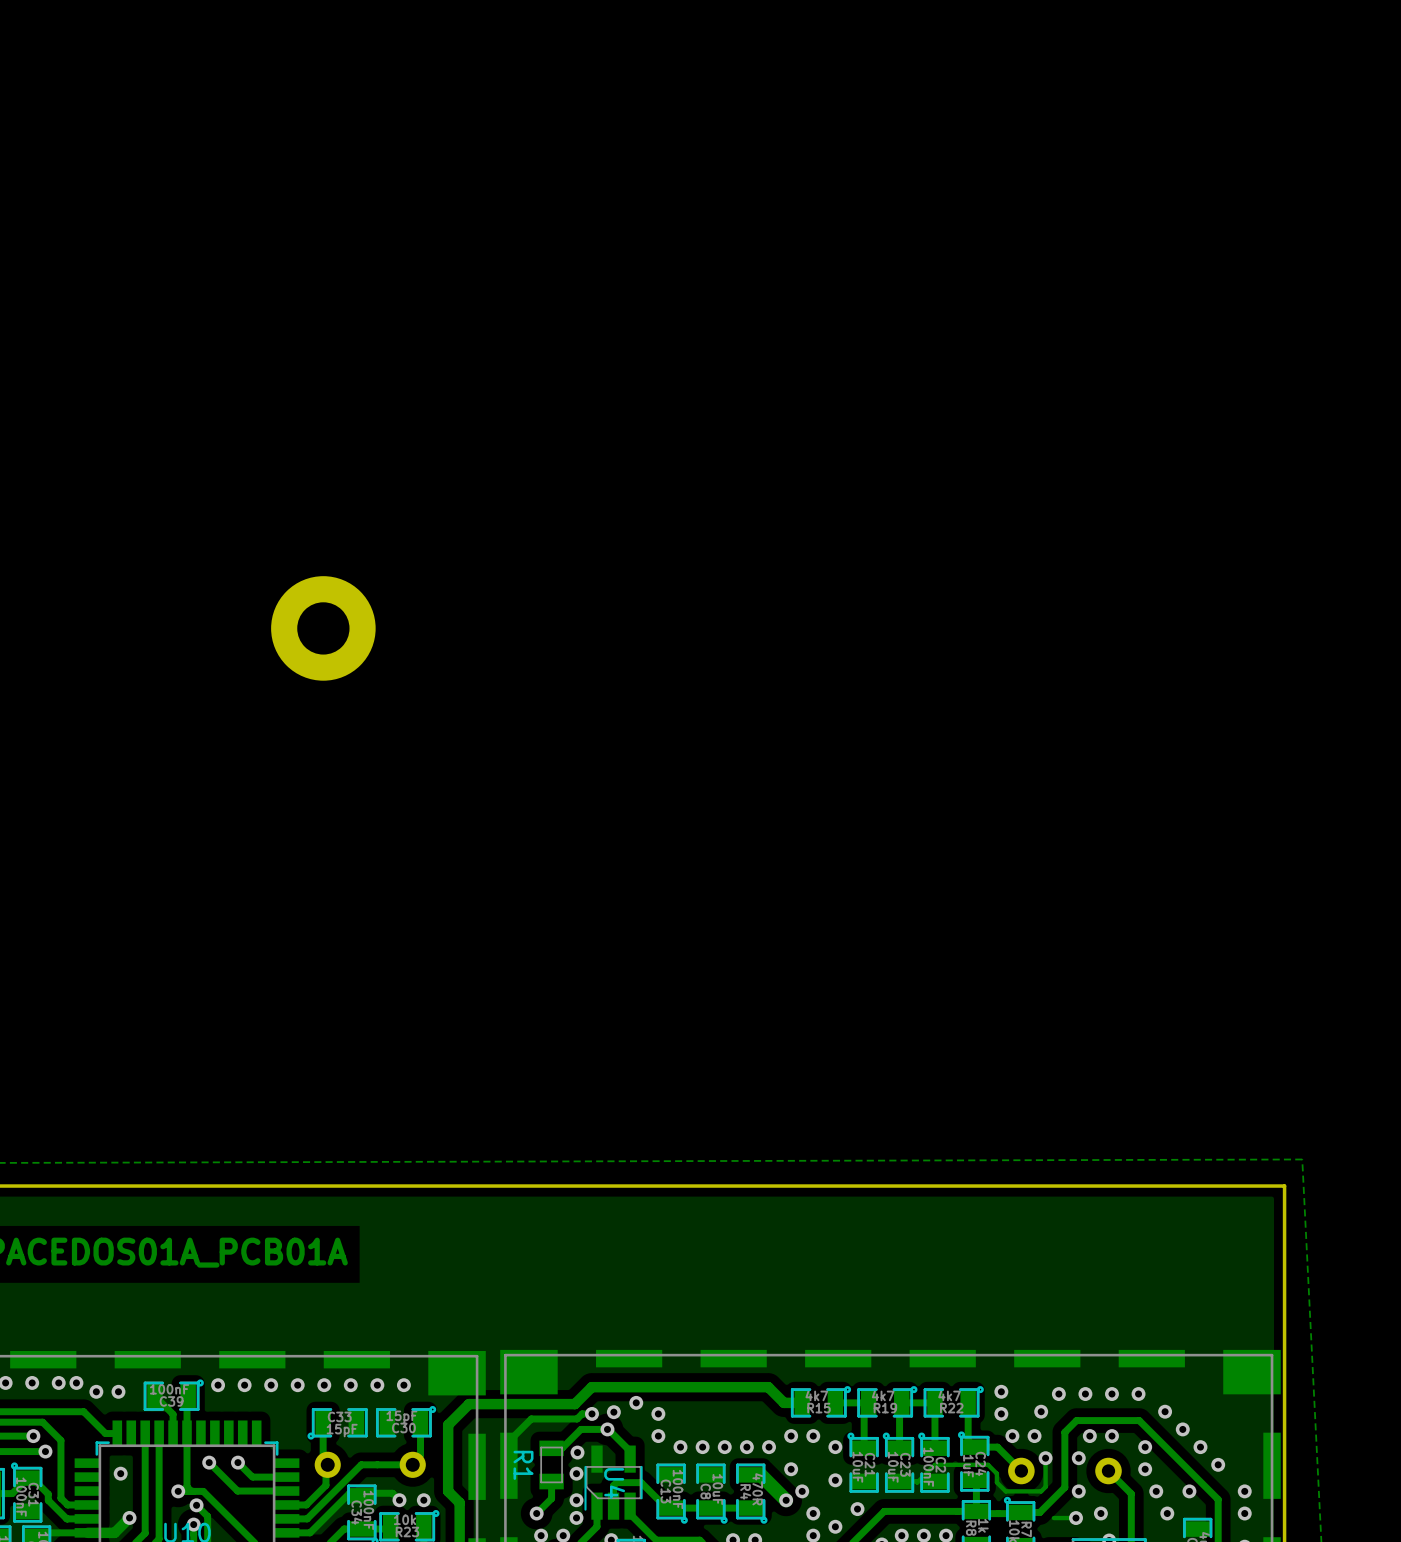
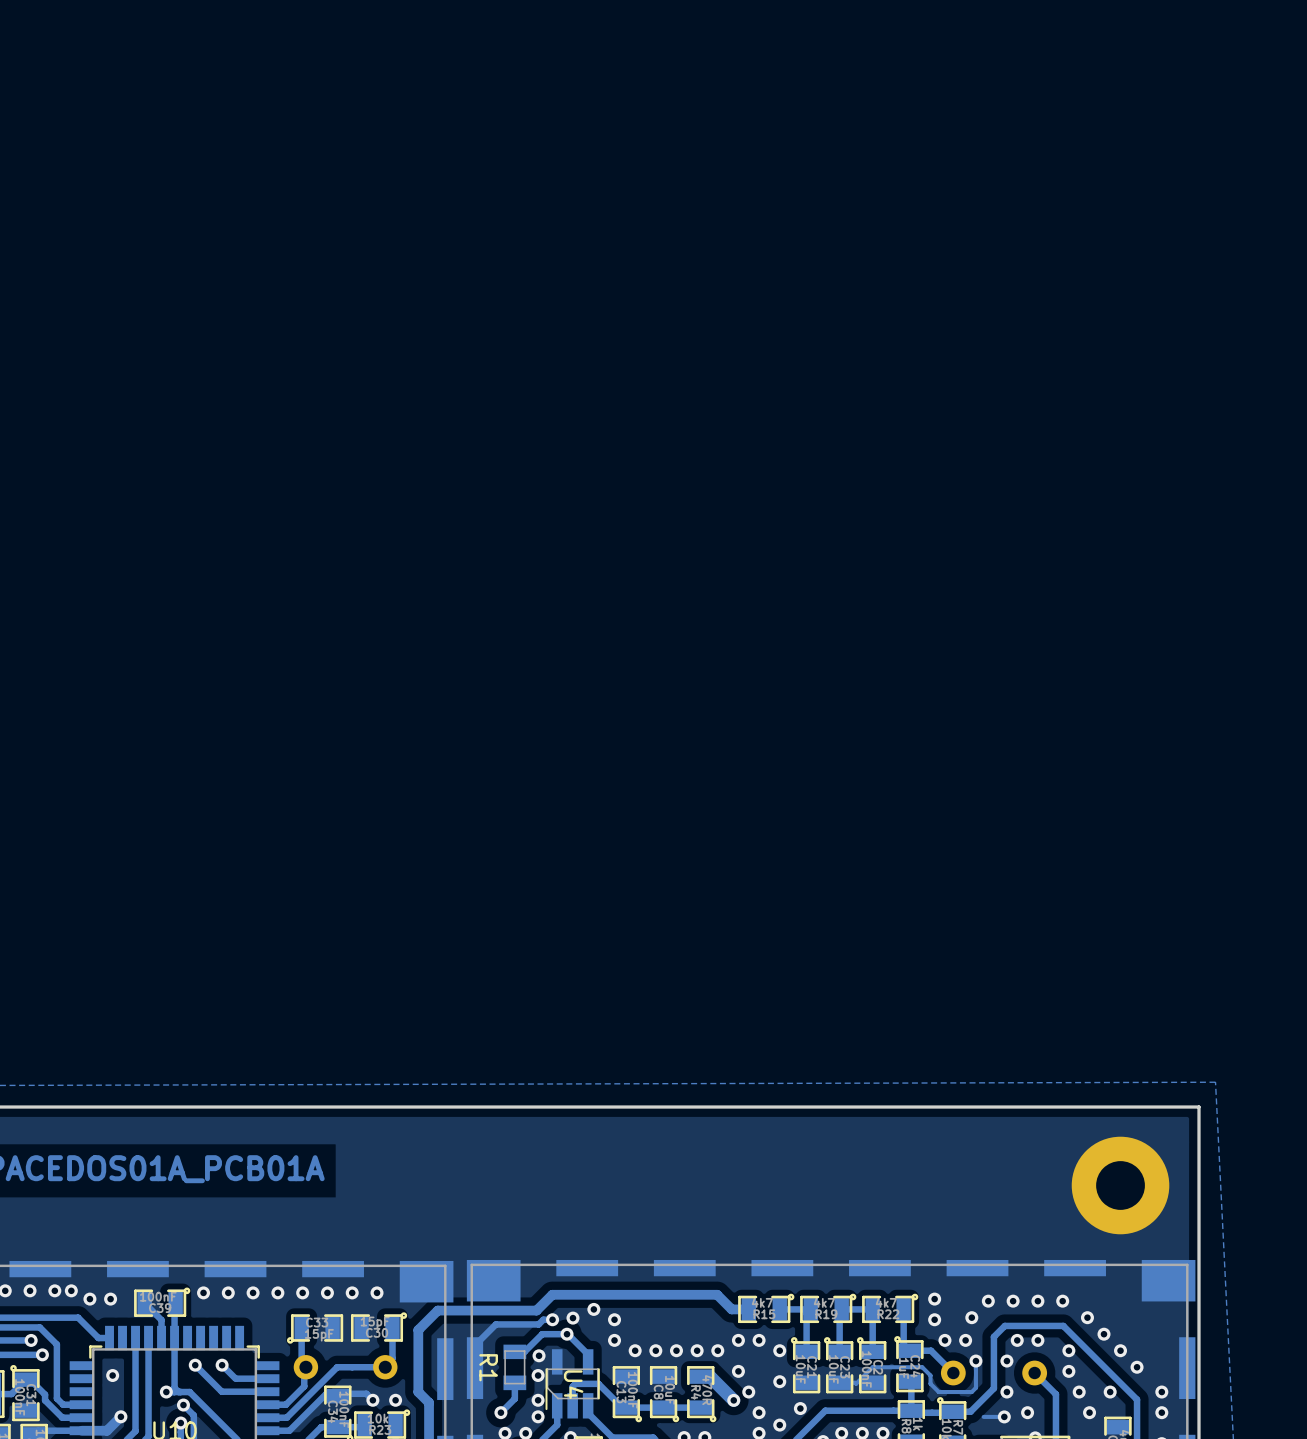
part: (323, 628) -> none
part: none -> (1120, 1185)

